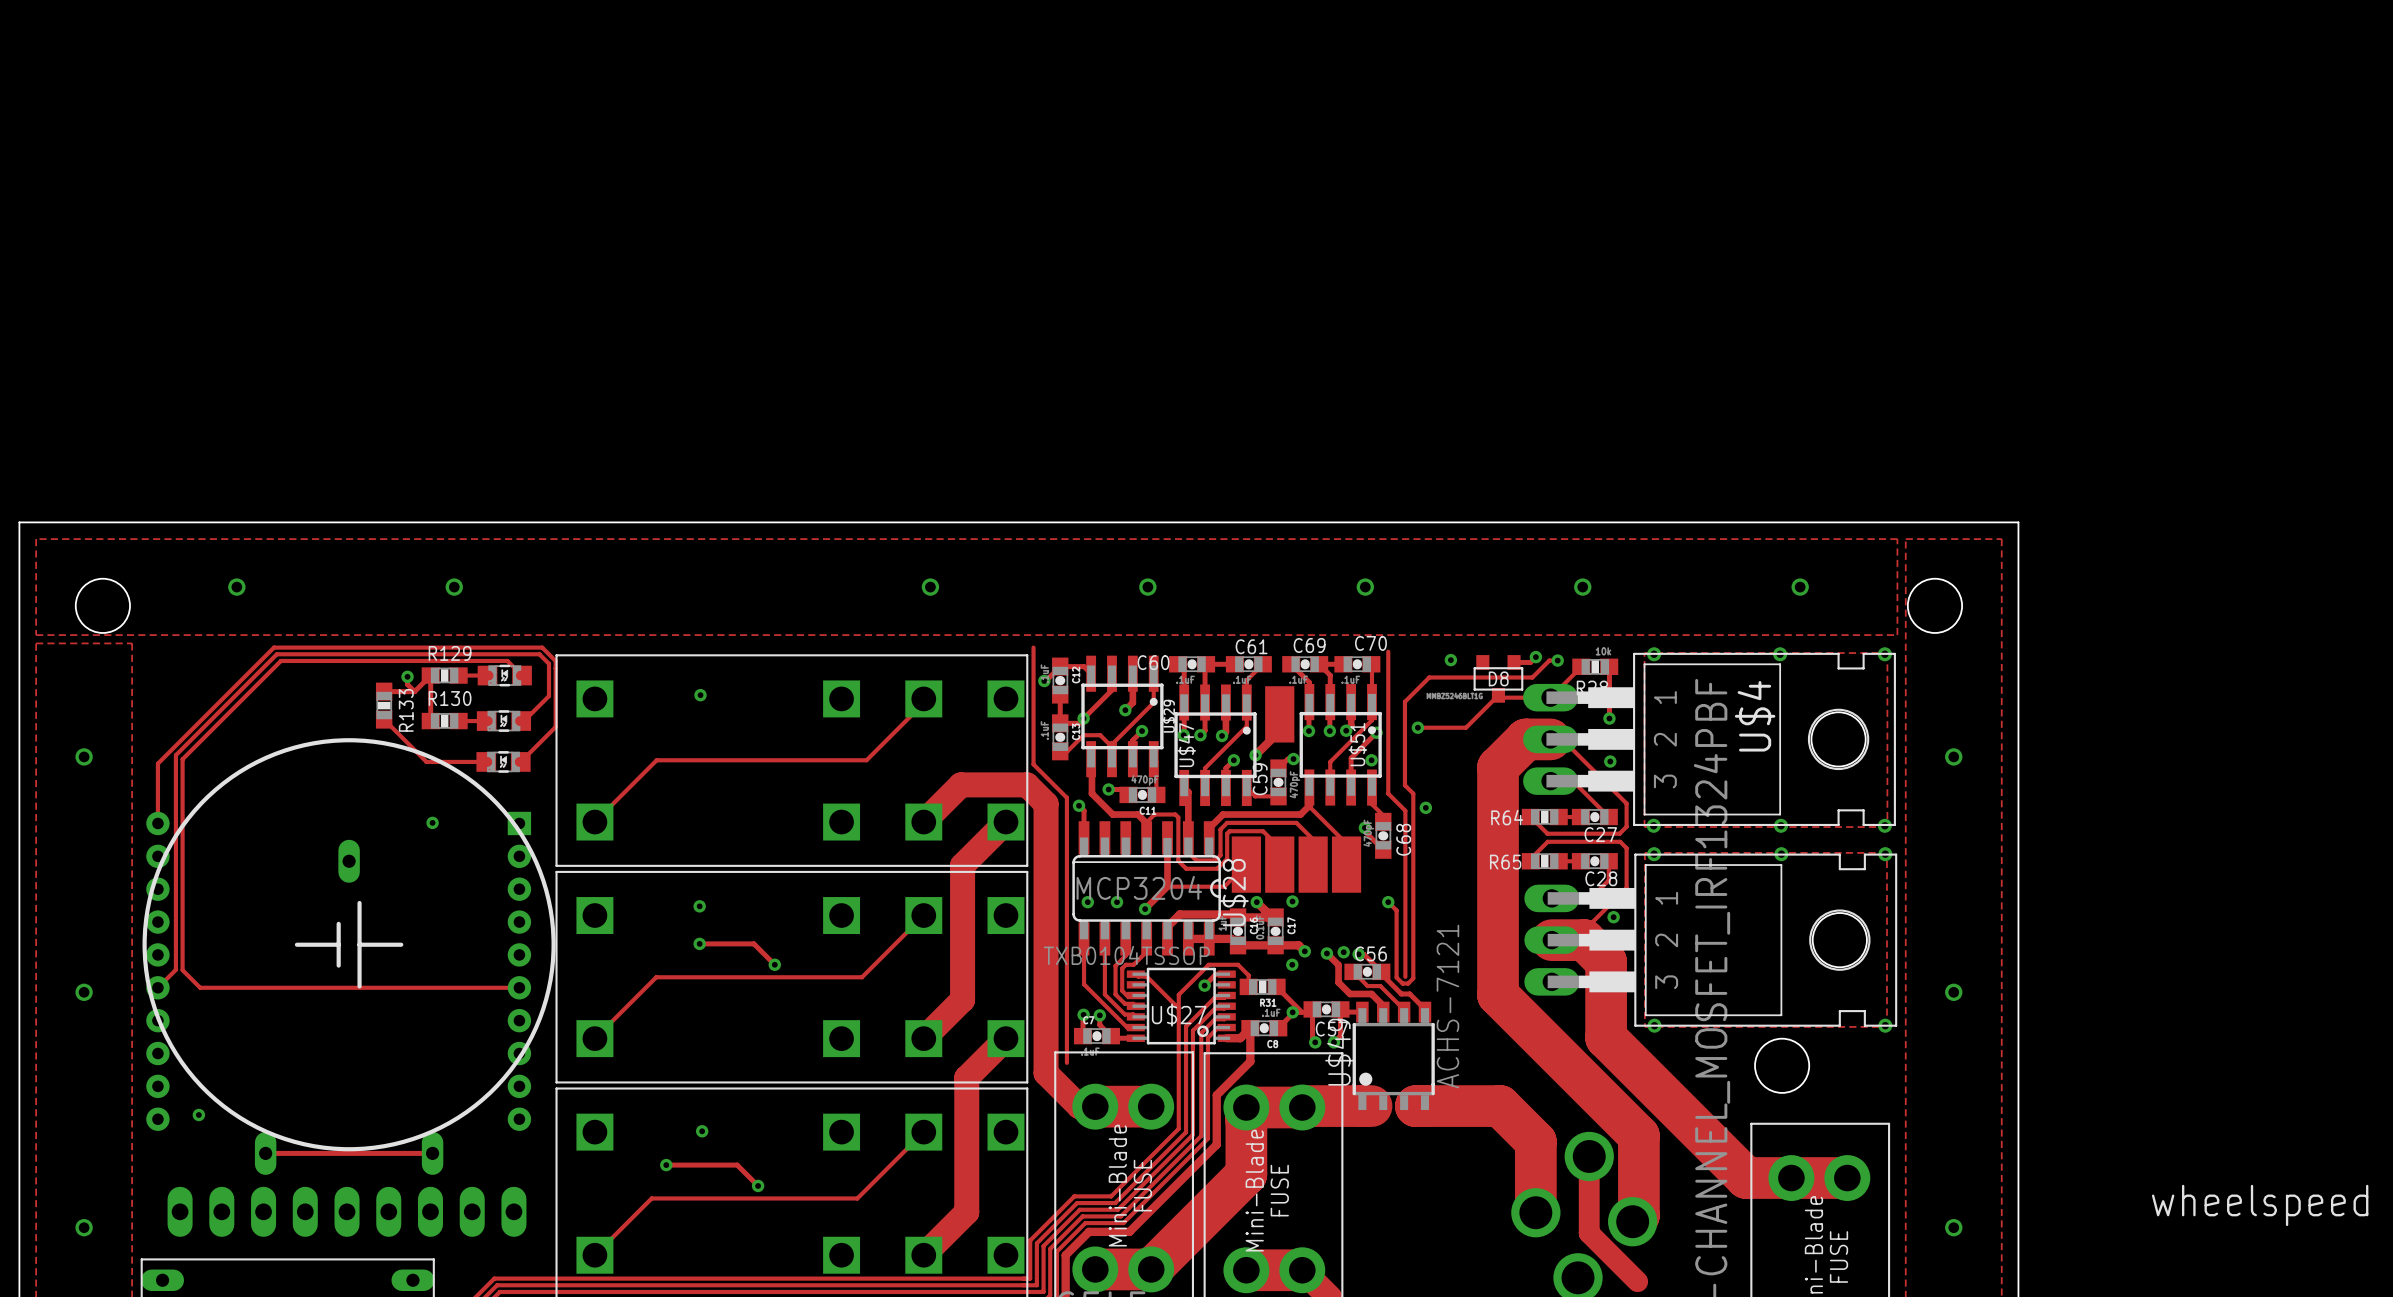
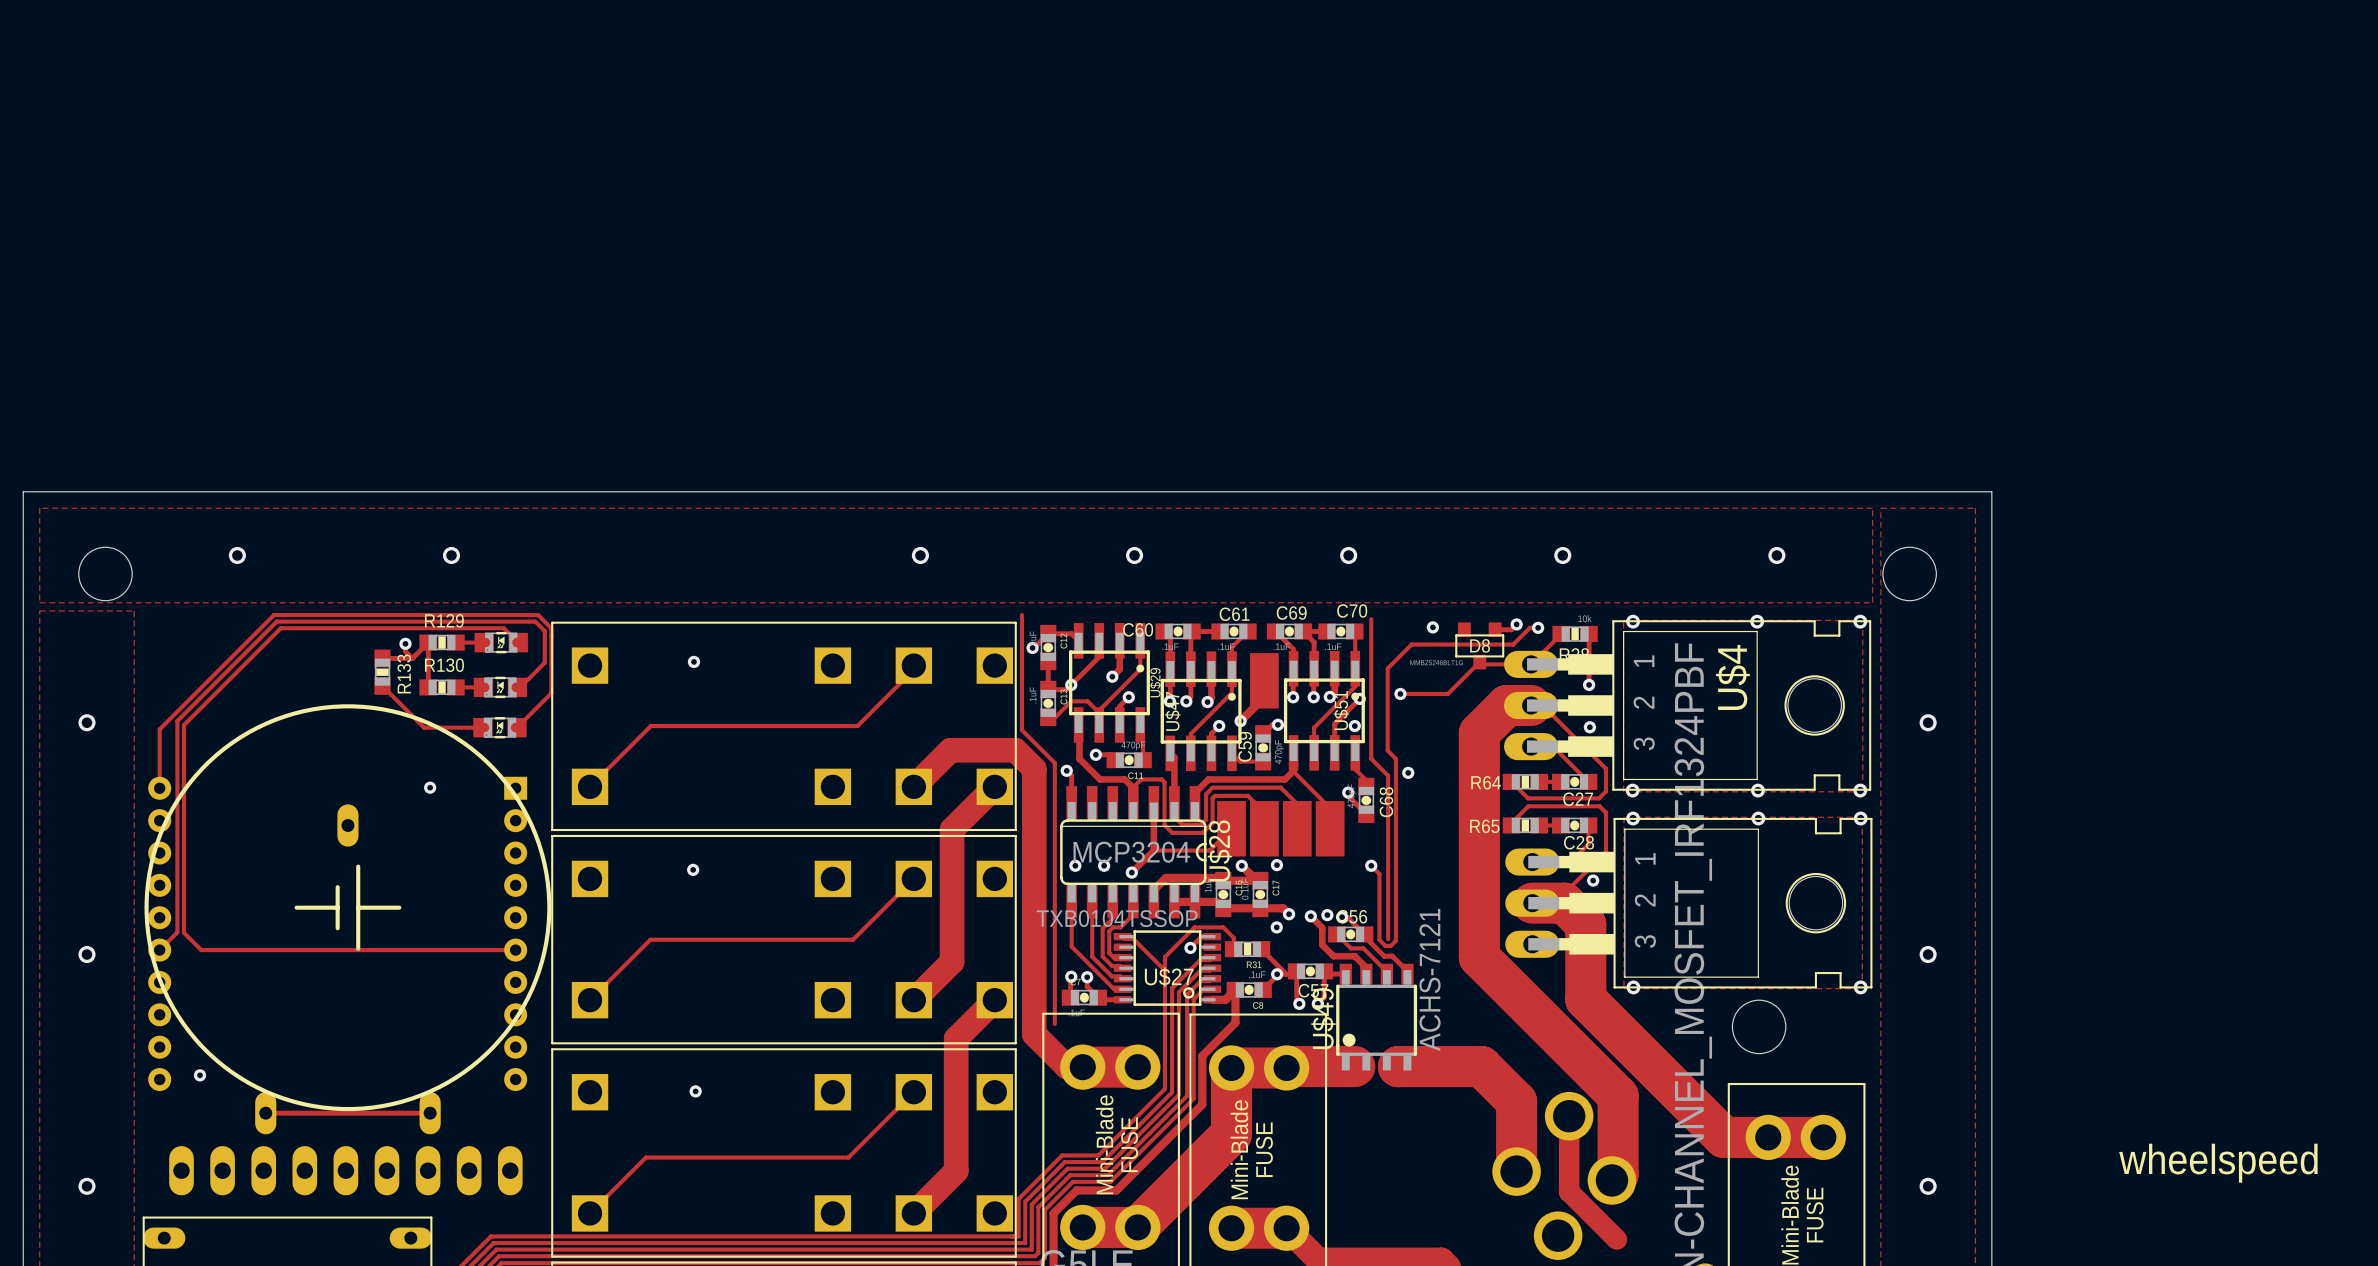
track: (699, 943) (753, 943) (774, 964) -> none
via: (699, 943) -> none
via: (774, 964) -> none
track: (666, 1165) (737, 1165) (758, 1185) -> none
via: (666, 1165) -> none
via: (758, 1185) -> none

